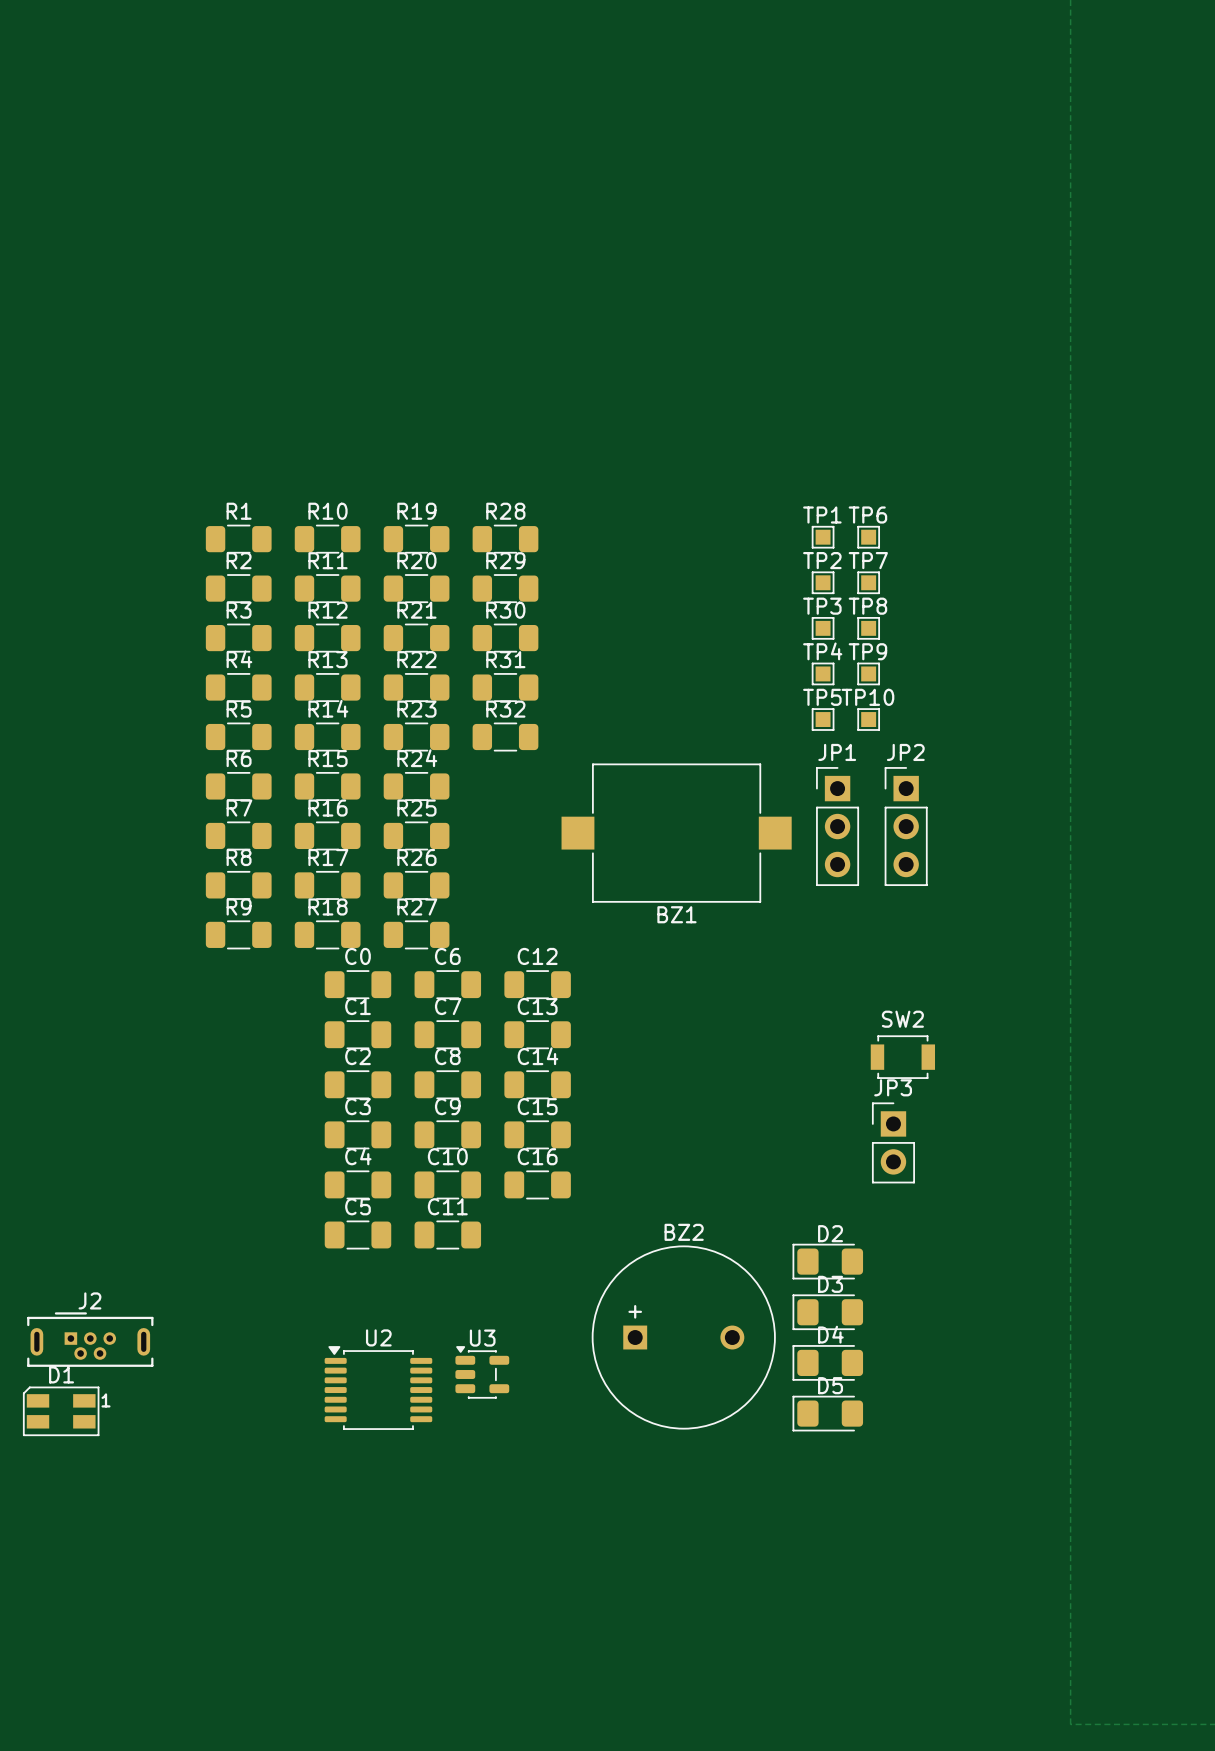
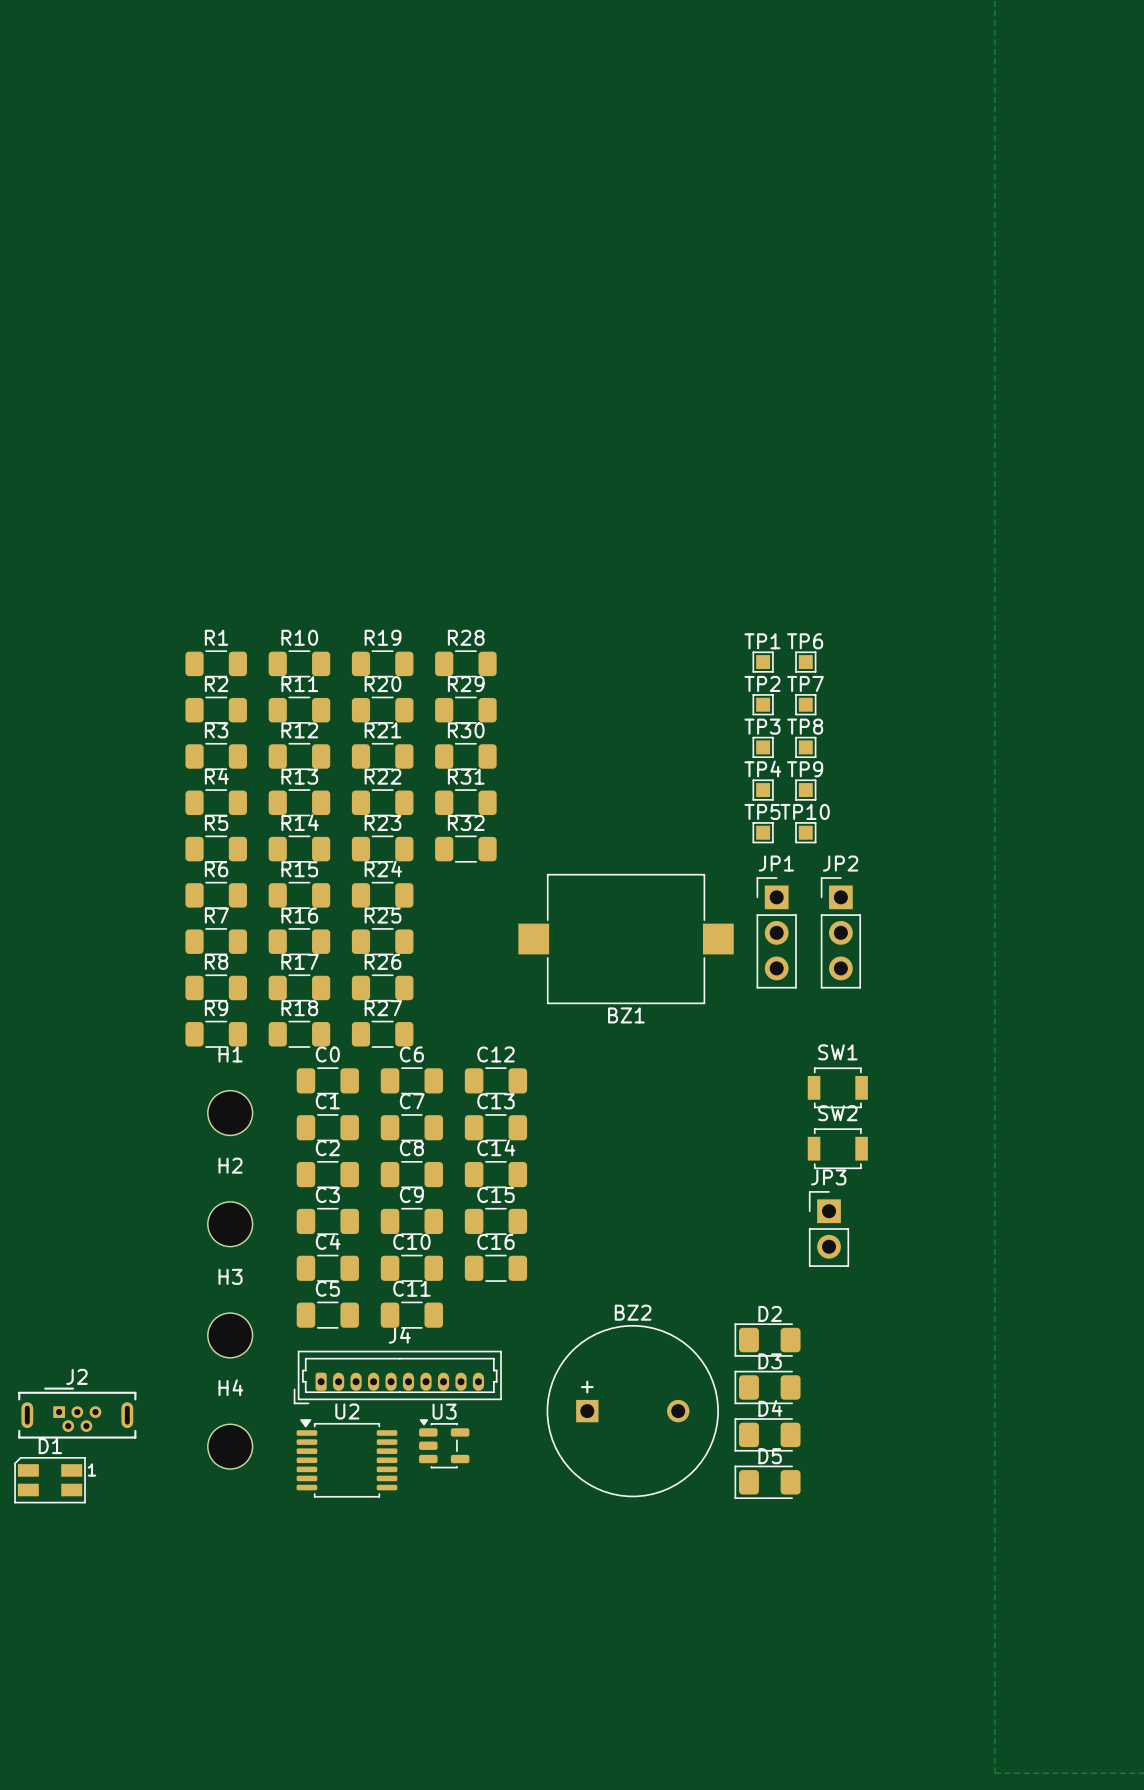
SW1: none -> (837, 1087)
H1: none -> (230, 1113)
H2: none -> (230, 1224)
H3: none -> (230, 1335)
J4: none -> (397, 1377)
H4: none -> (230, 1446)

